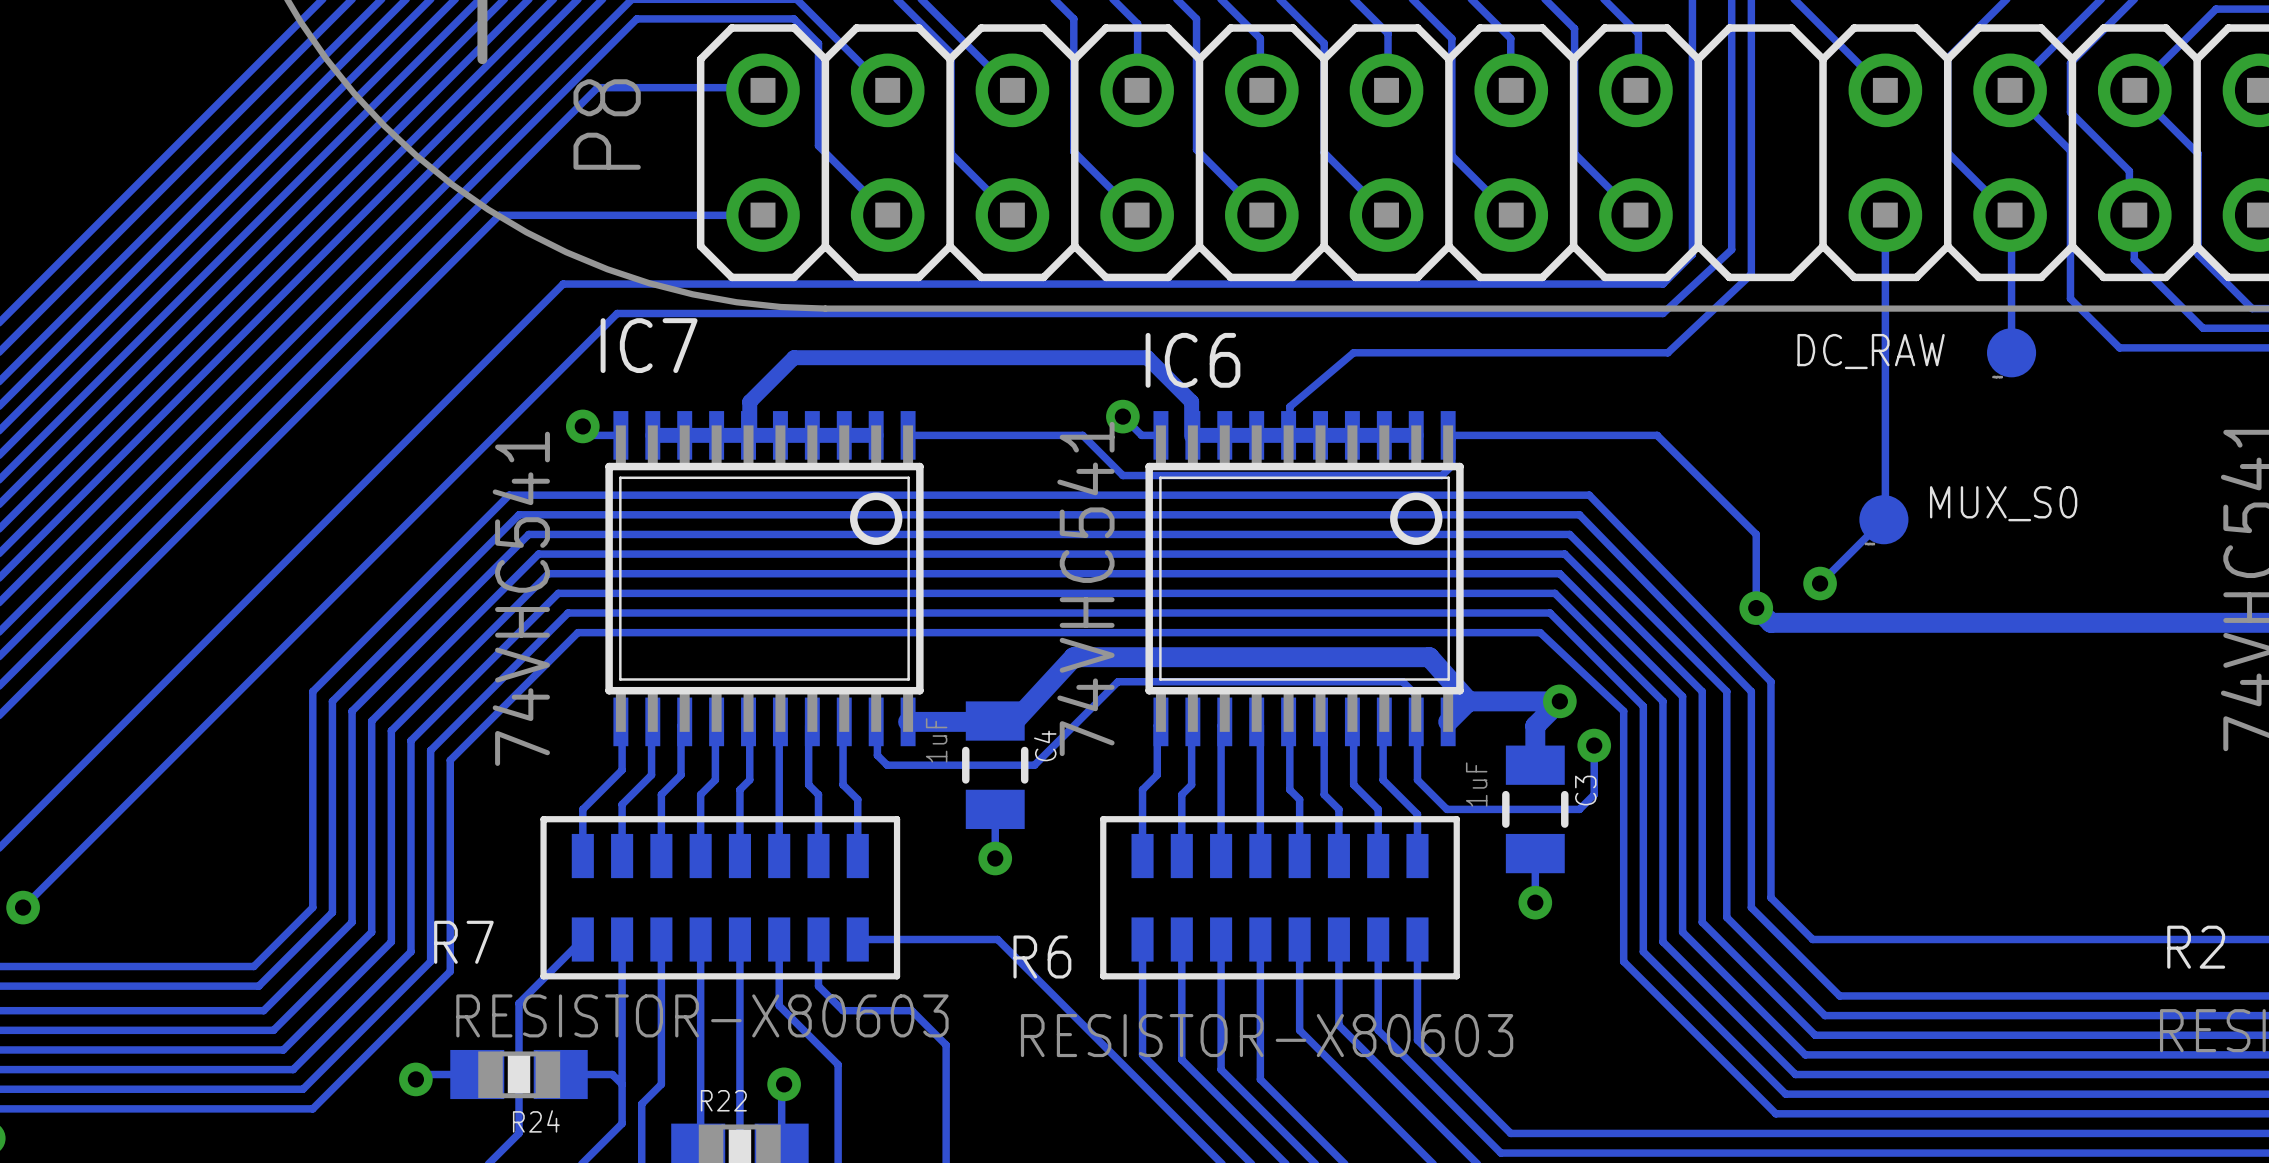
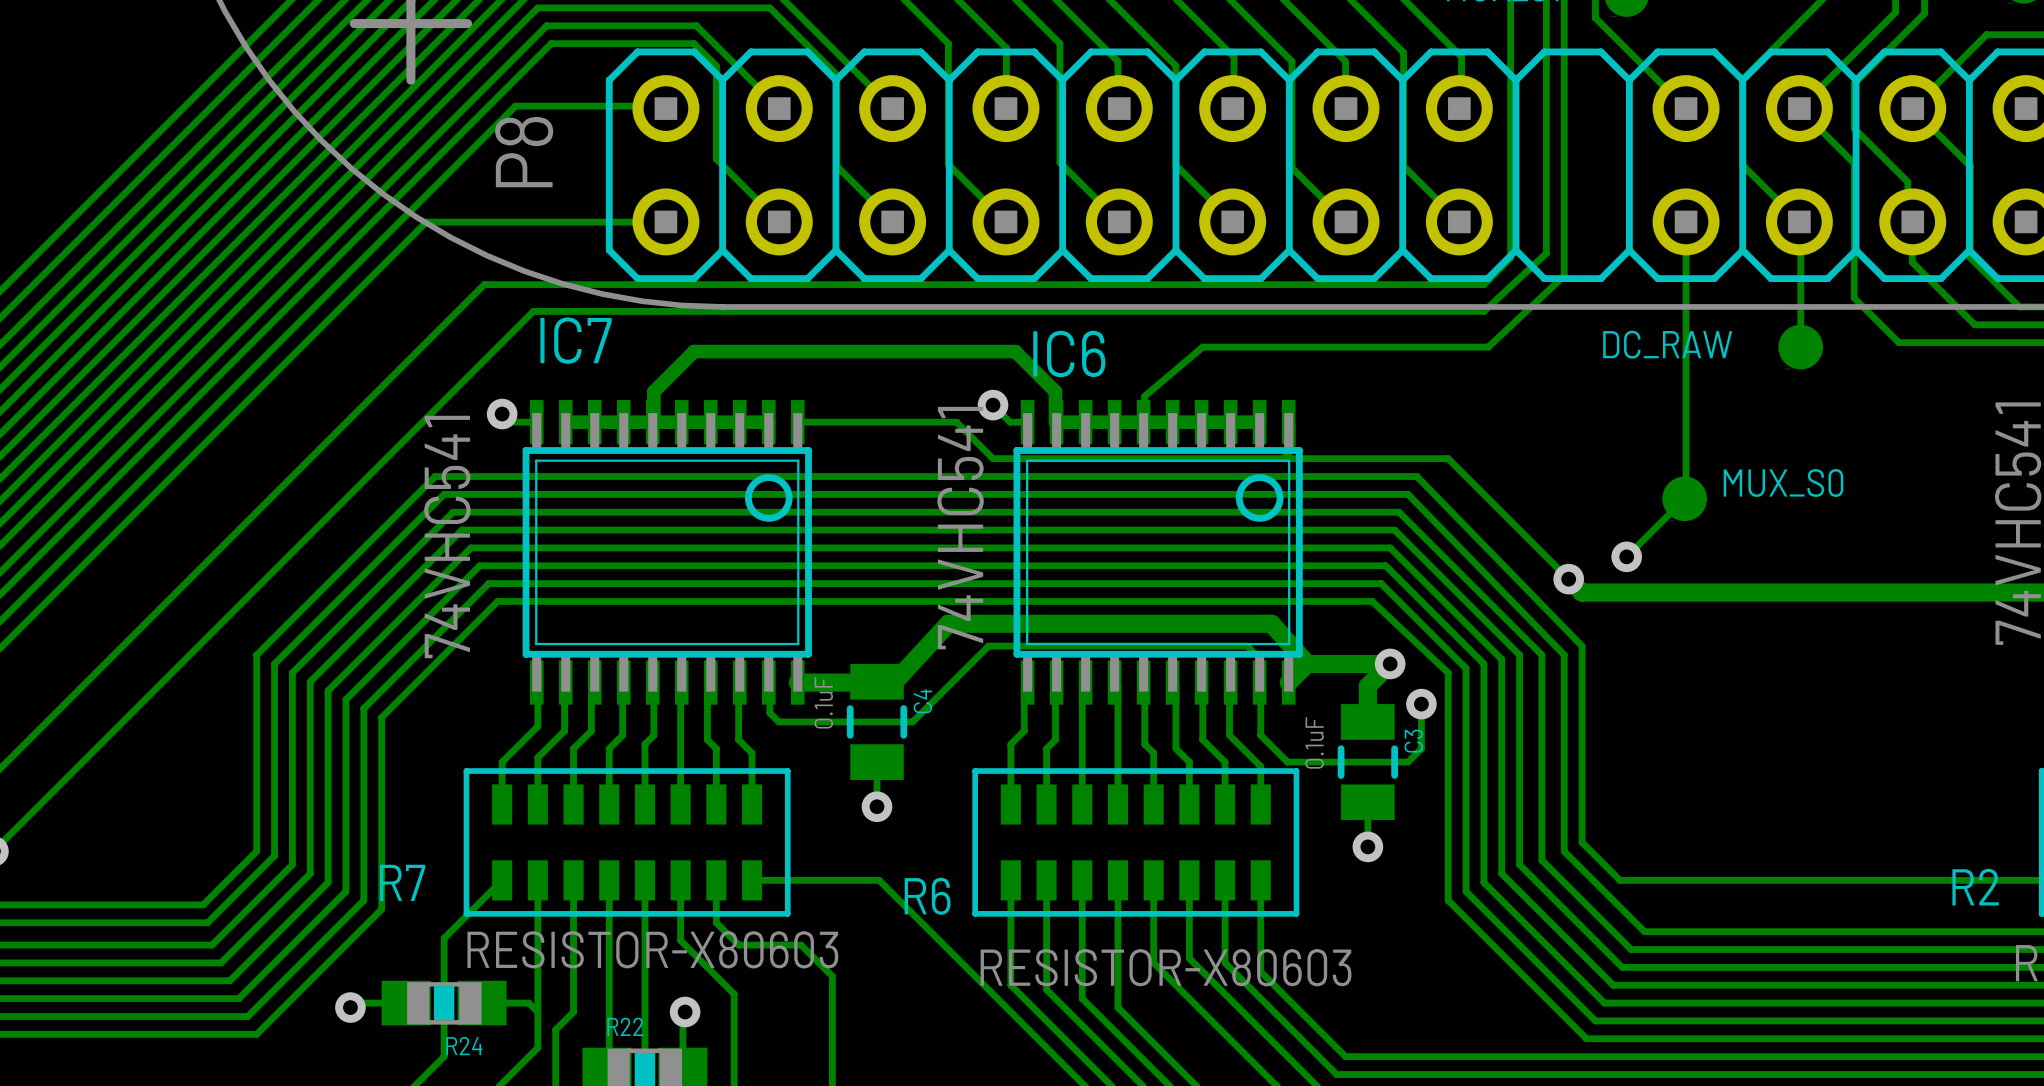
track: (1448, 435) (1657, 435) (1756, 534) (1756, 608) -> (1283, 458) (1448, 458) (1568, 579)
C4 value: 1uF (936, 740) -> 0.1uF (823, 702)
C3 value: 1uF (1476, 784) -> 0.1uF (1314, 742)

